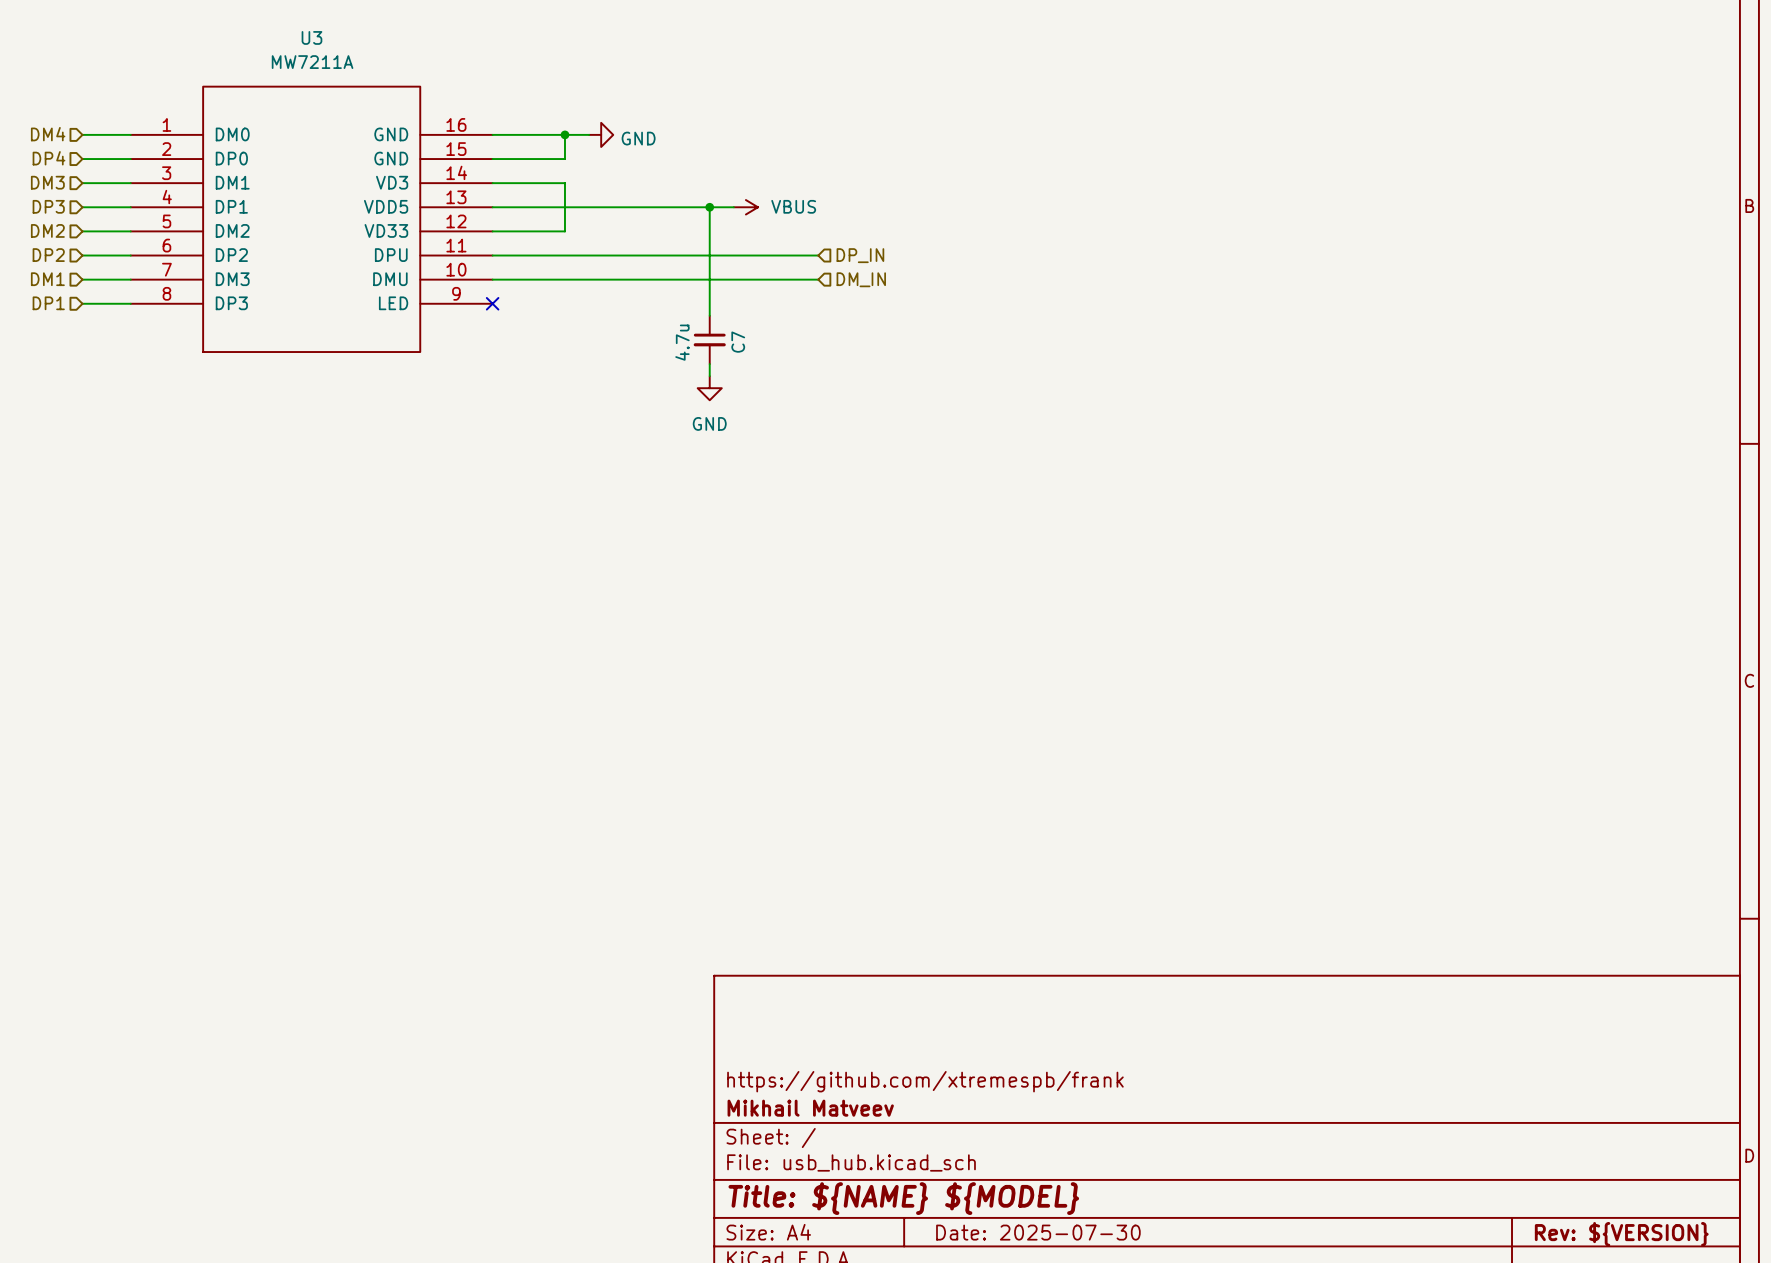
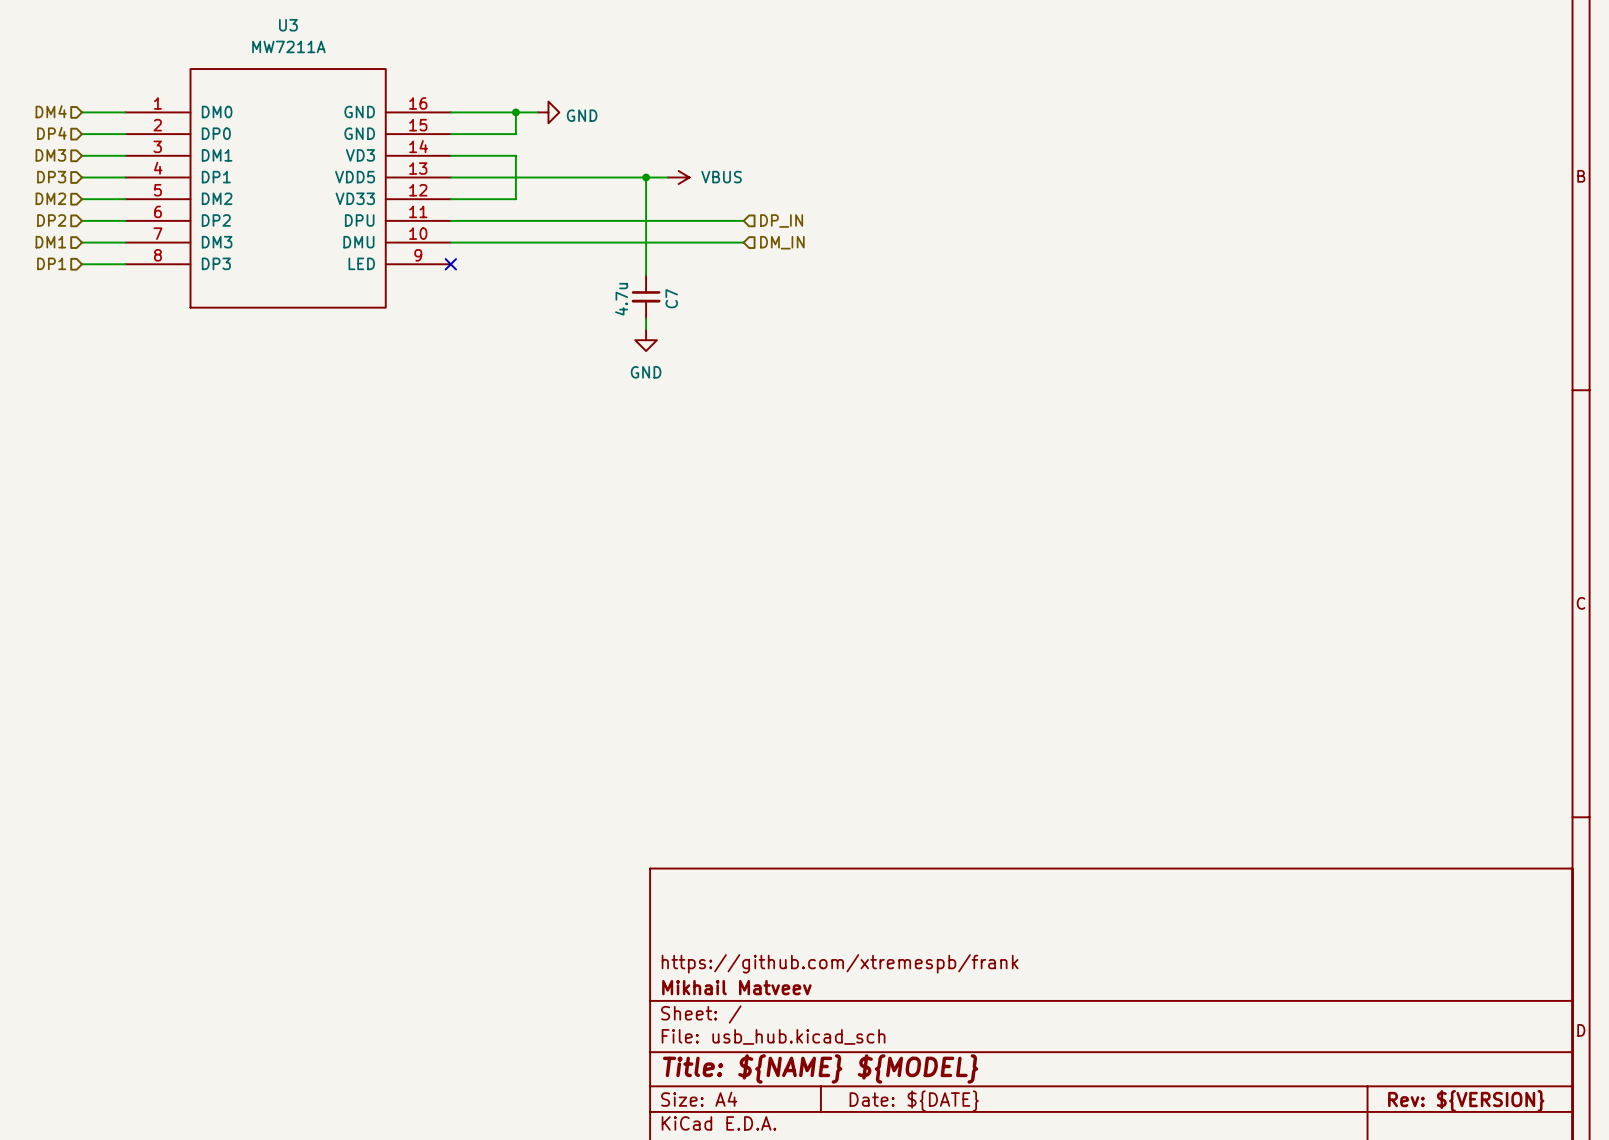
title block: Date: 2025-07-30 (1038, 1232) -> Date: ${DATE} (914, 1101)

